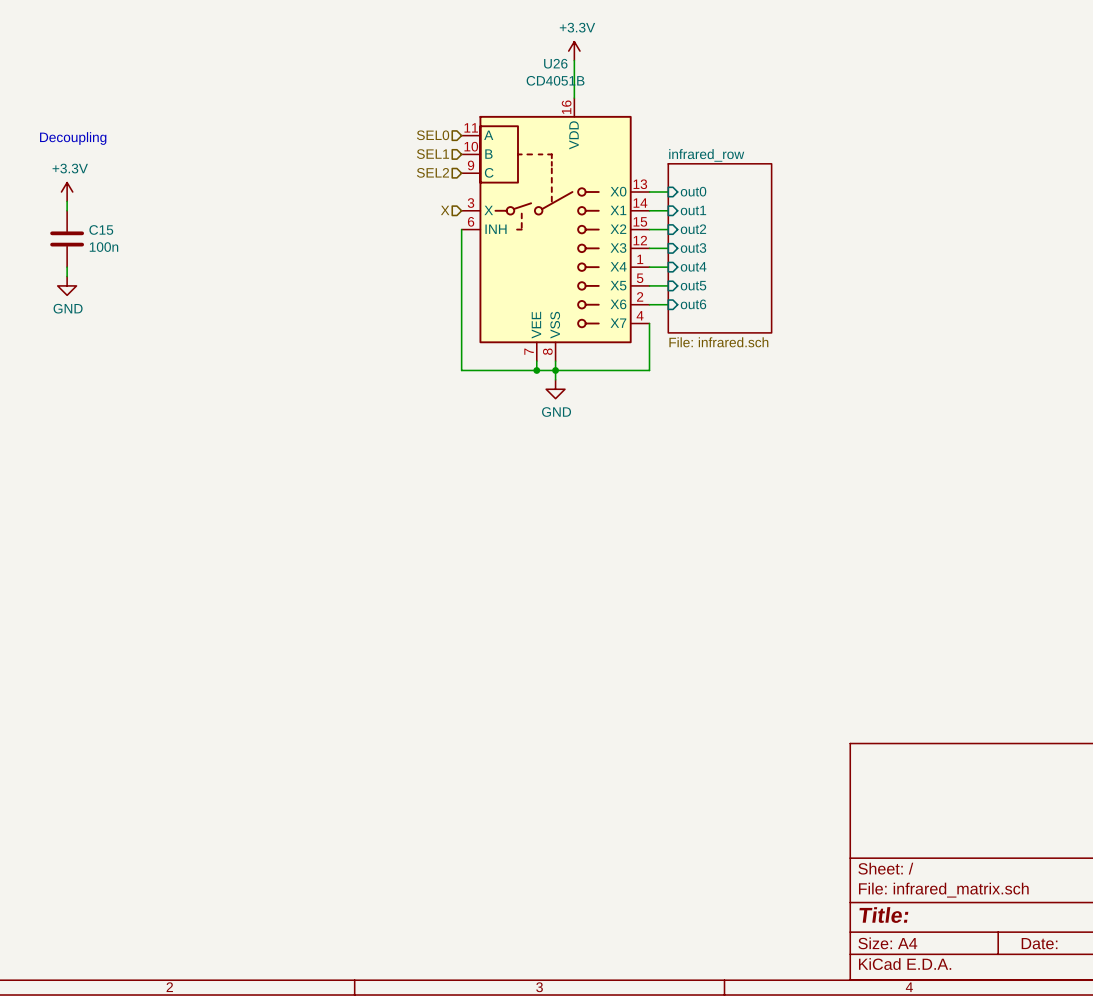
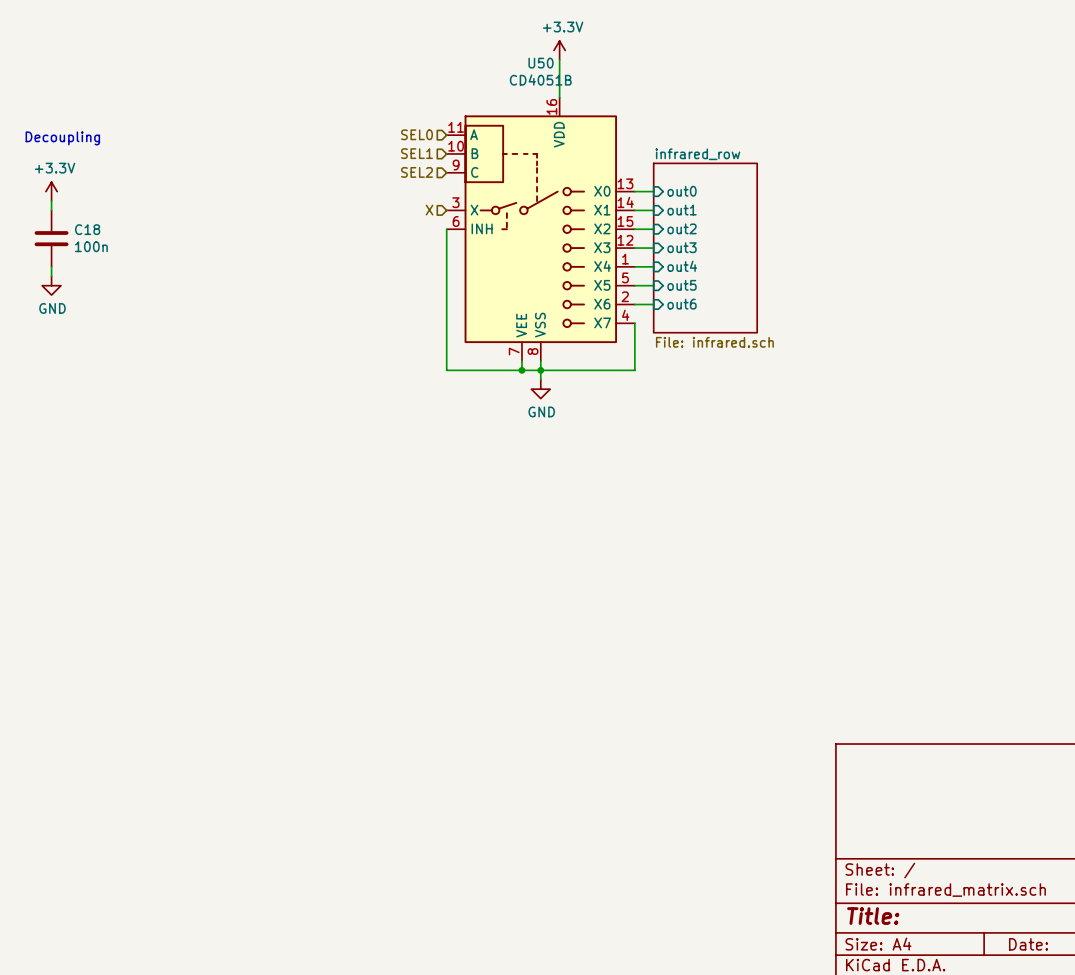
U26 name: U26 (555, 63) -> U50 (541, 63)
C15 name: C15 (101, 229) -> C18 (87, 229)

